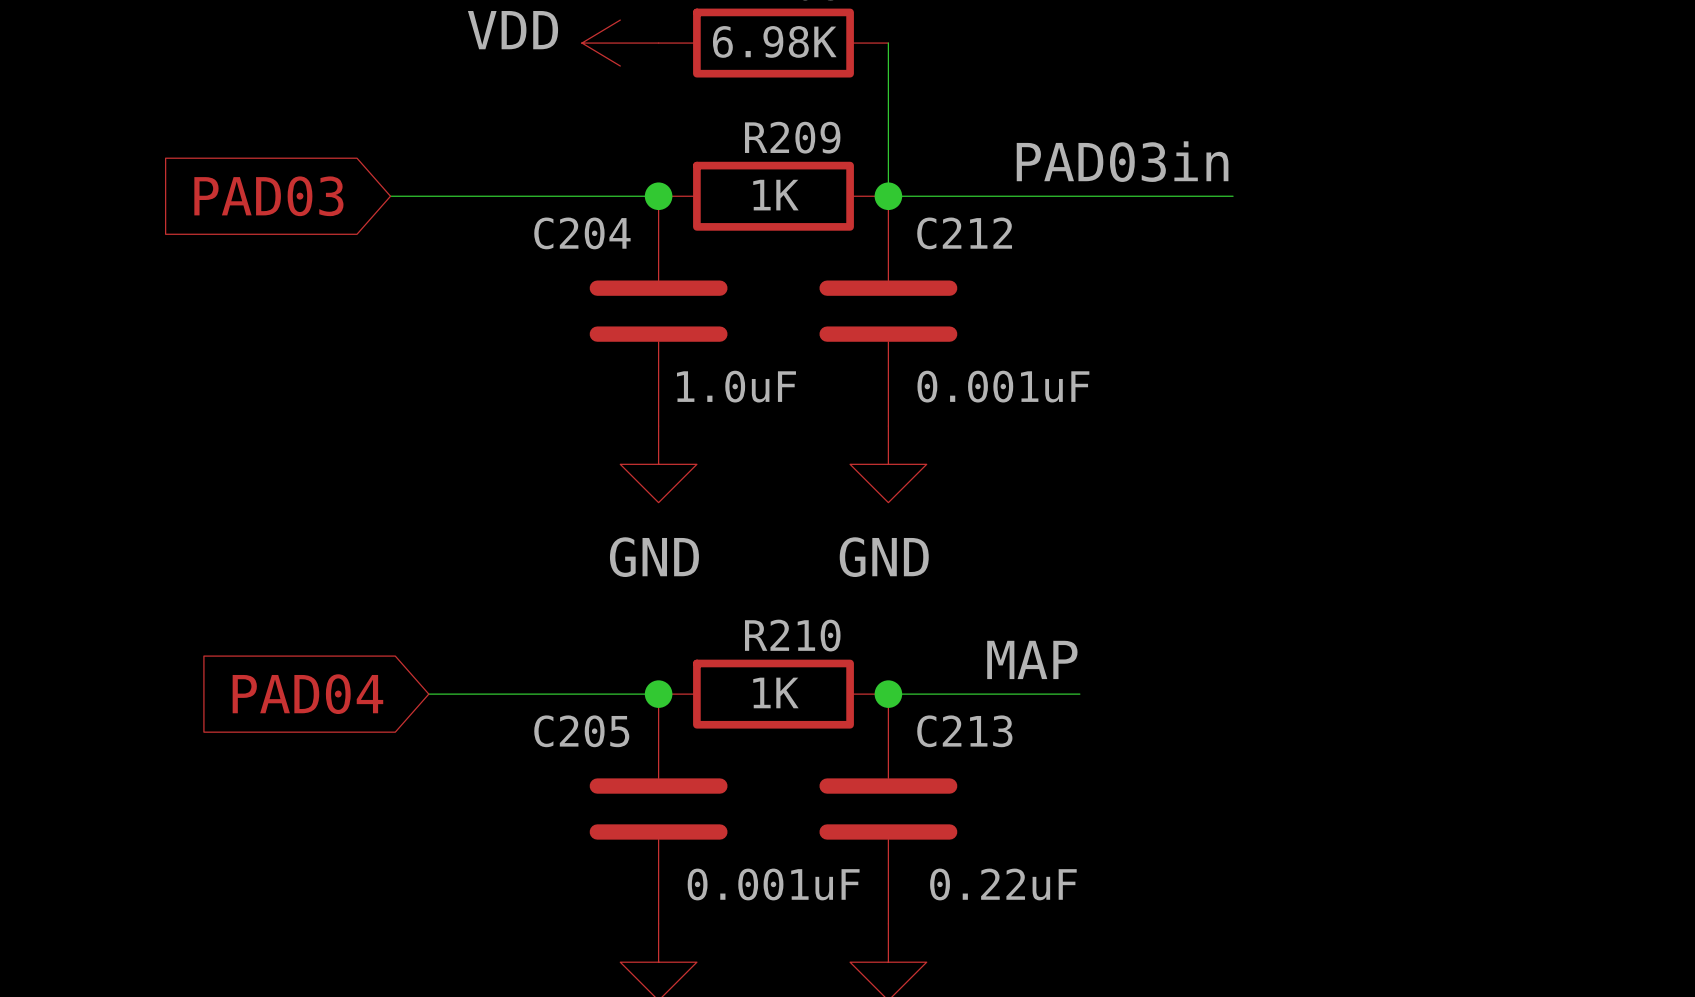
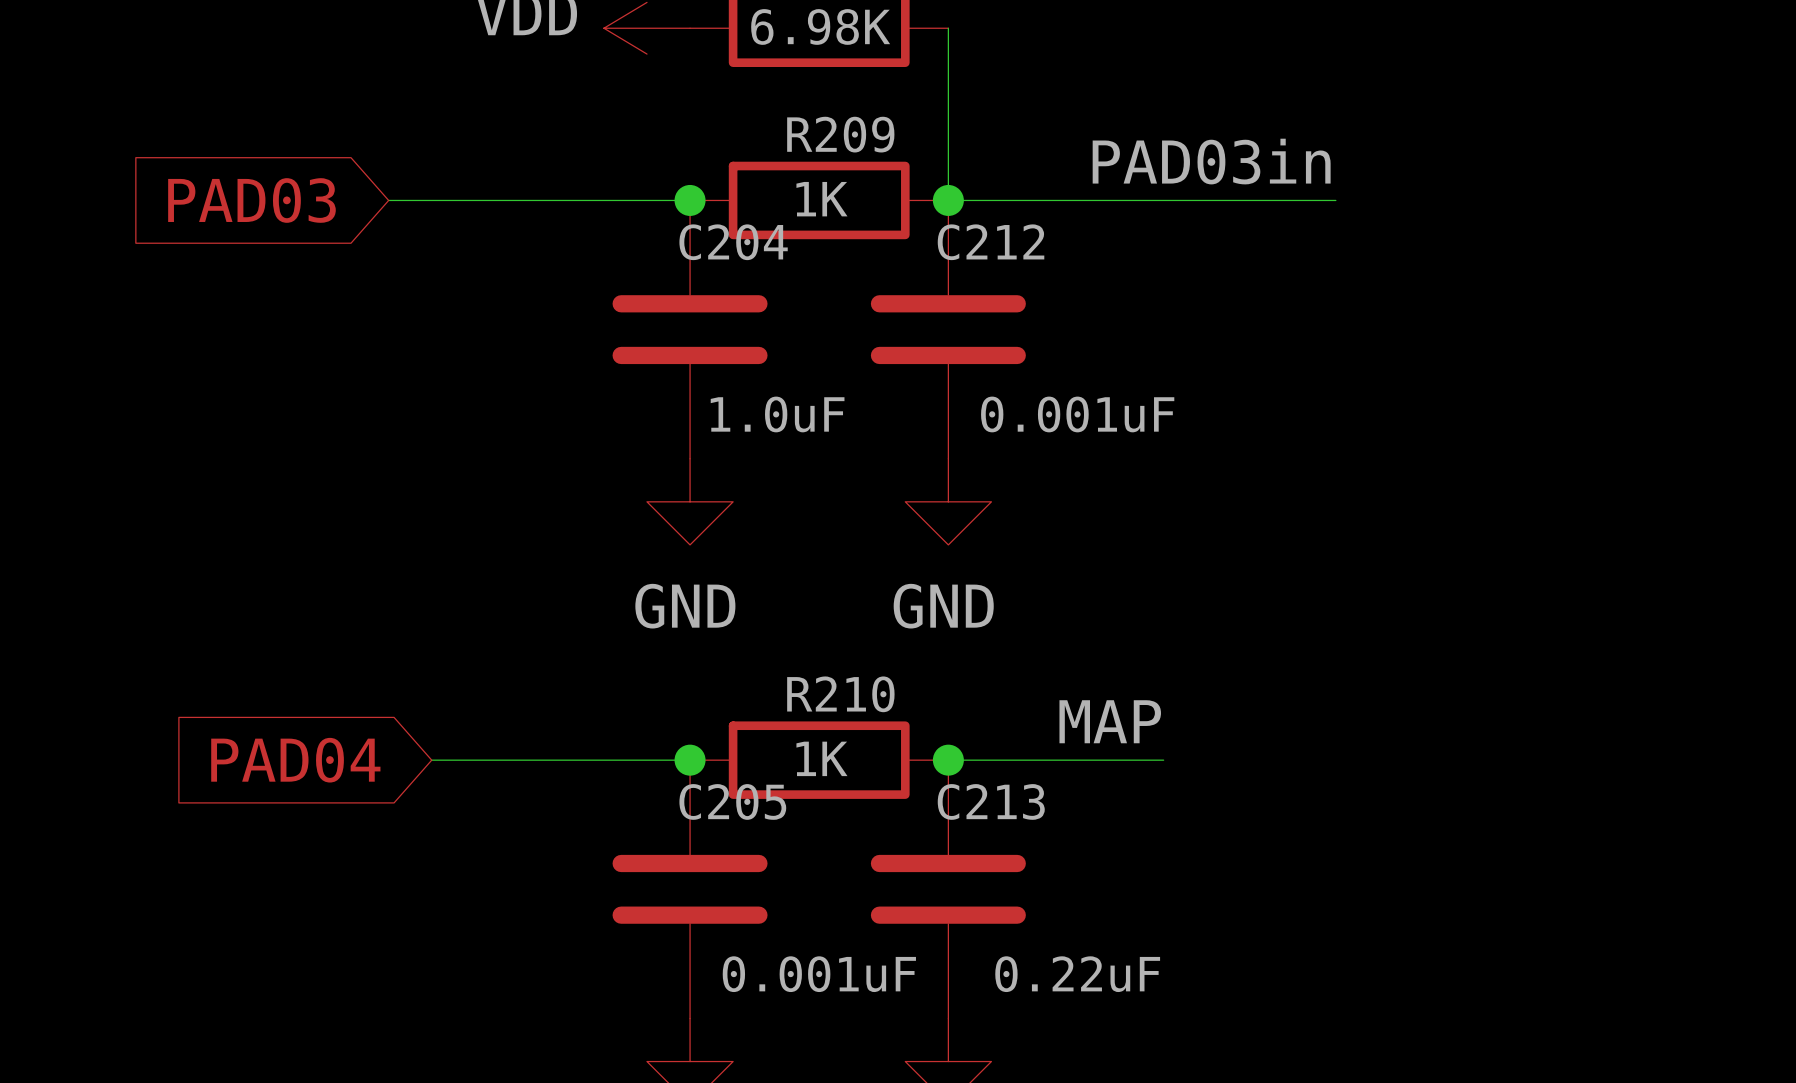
C204 name position: C204 (582, 233) -> C204 (733, 242)
C212 name position: C212 (964, 233) -> C212 (991, 242)
C205 name position: C205 (581, 731) -> C205 (732, 801)
C213 name position: C213 (964, 731) -> C213 (991, 801)

